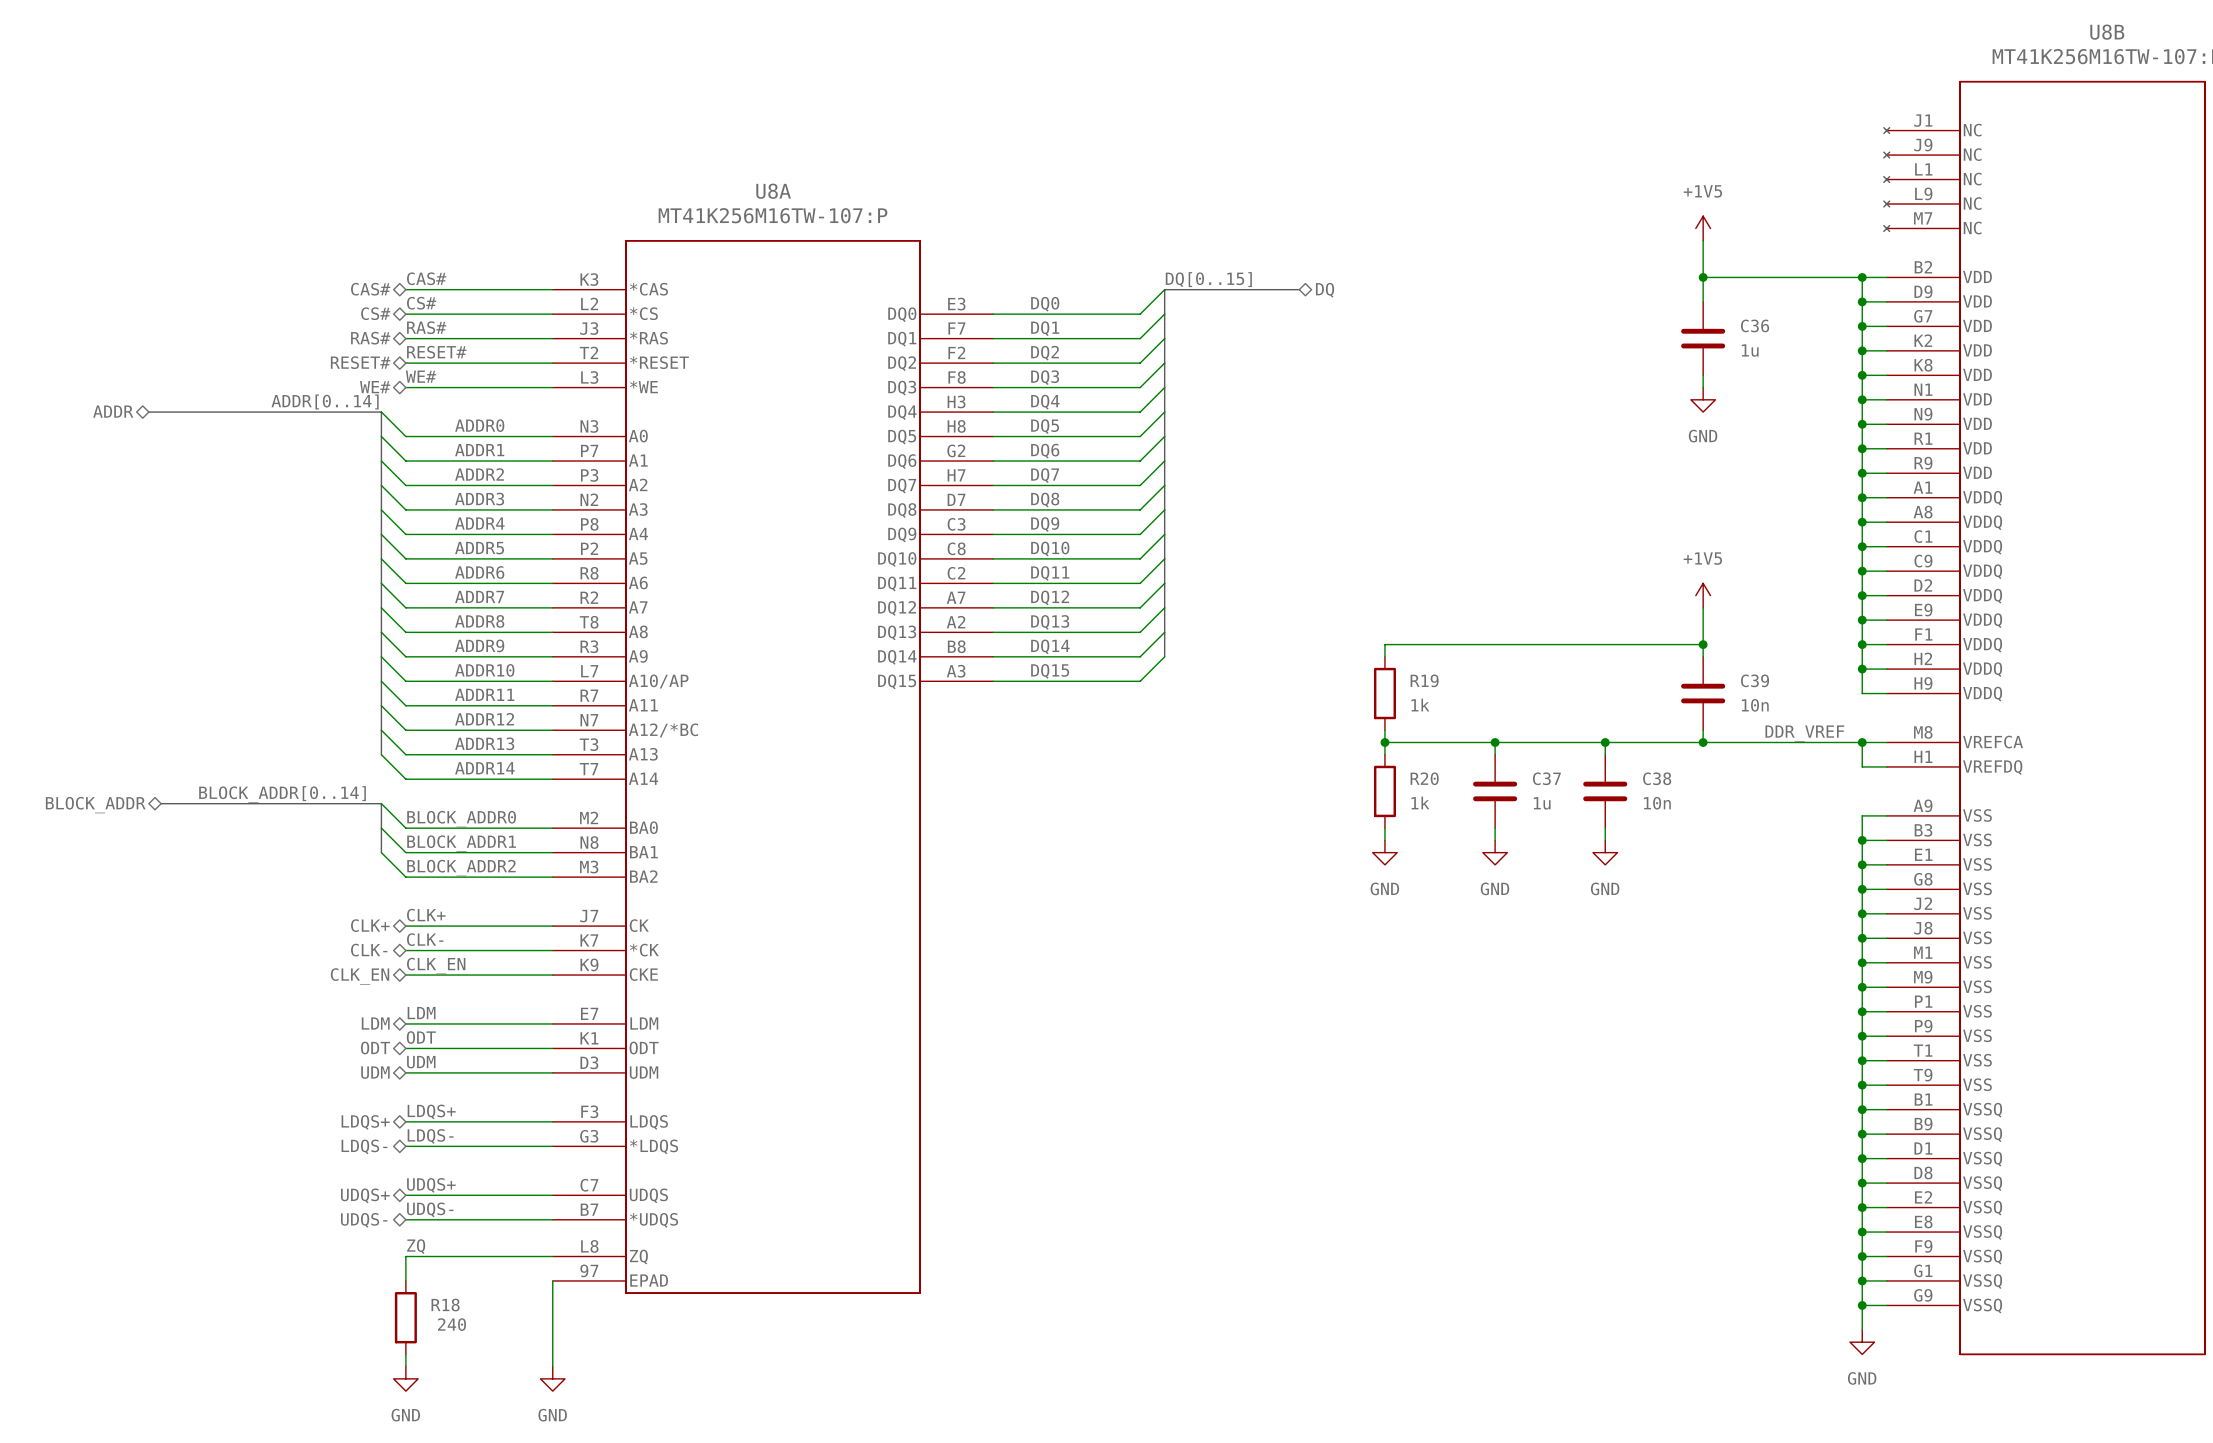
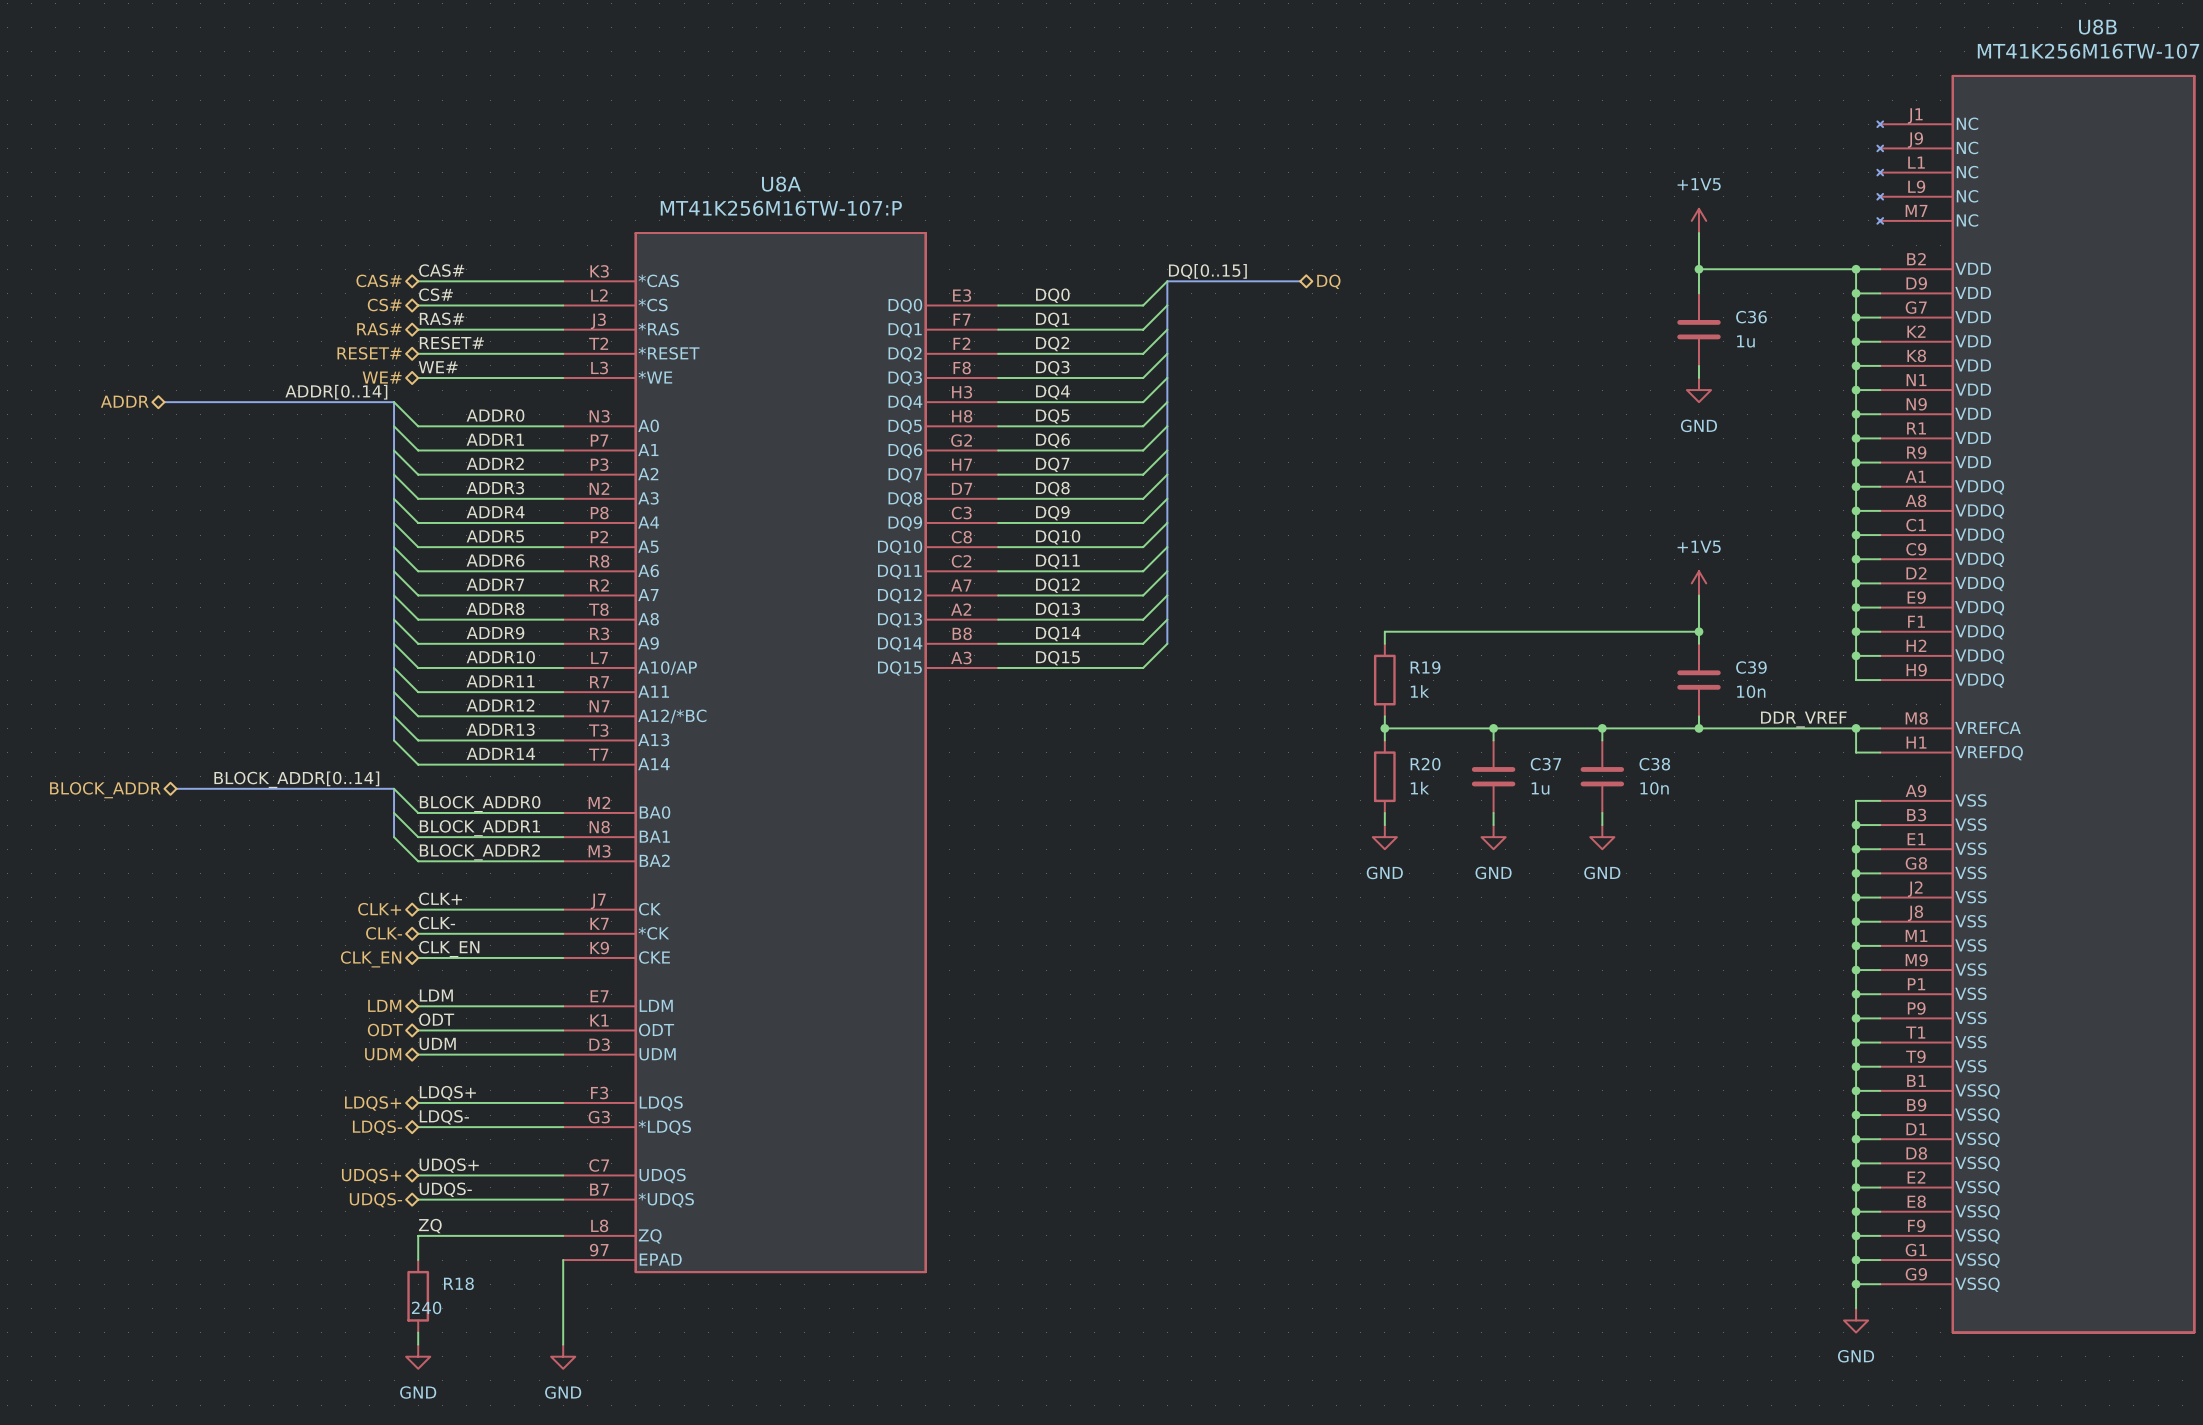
R18 value position: 240 (452, 1324) -> 240 (426, 1307)

